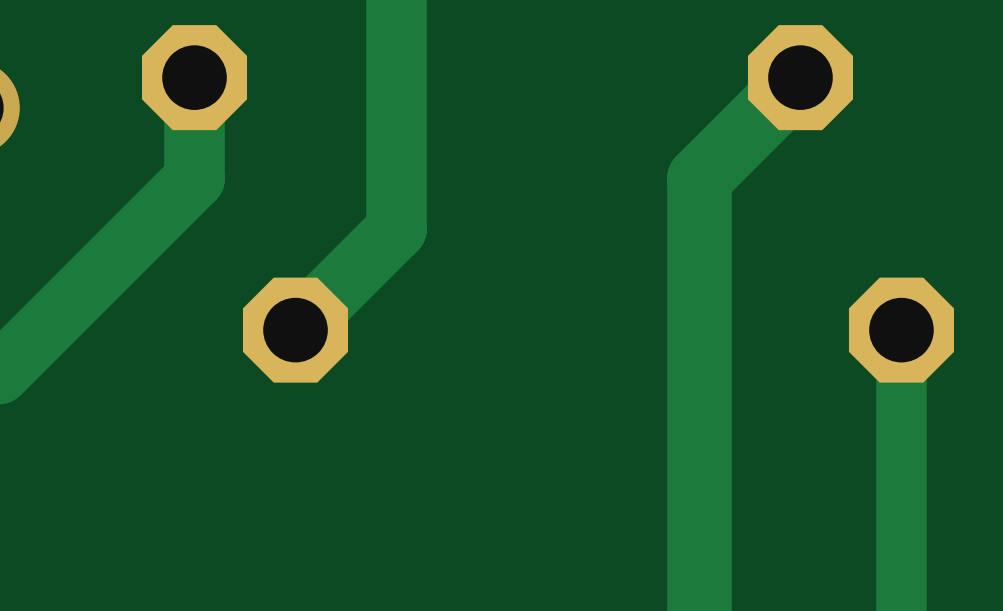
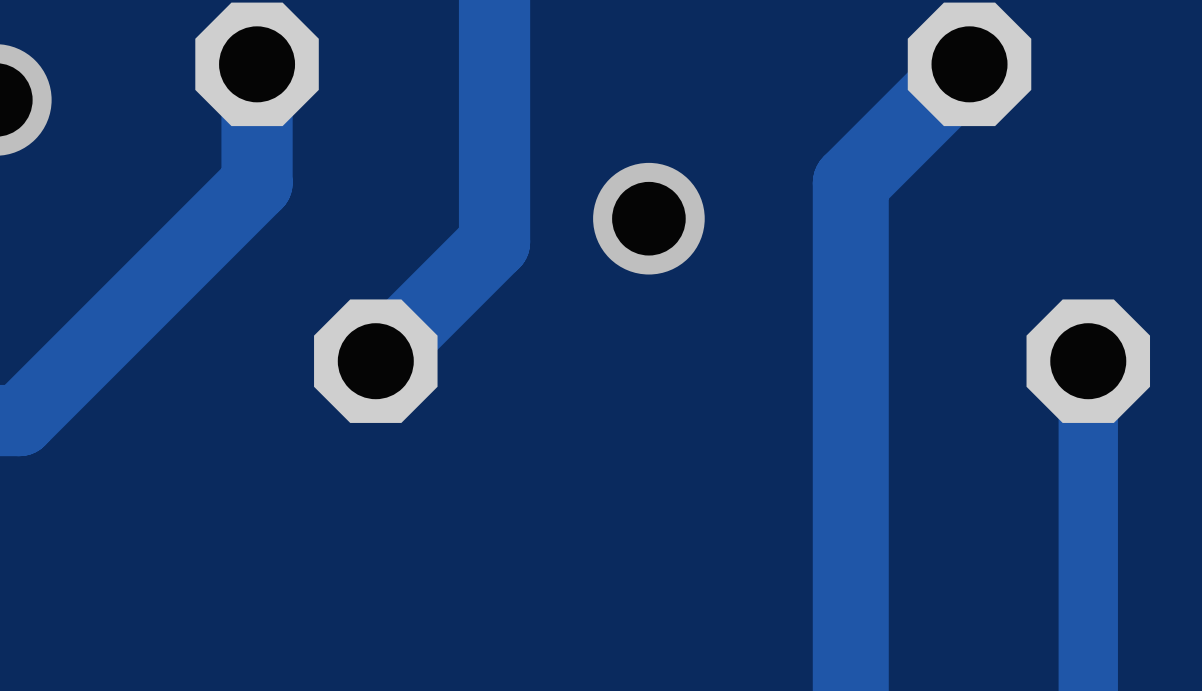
via: none -> (648, 218)

